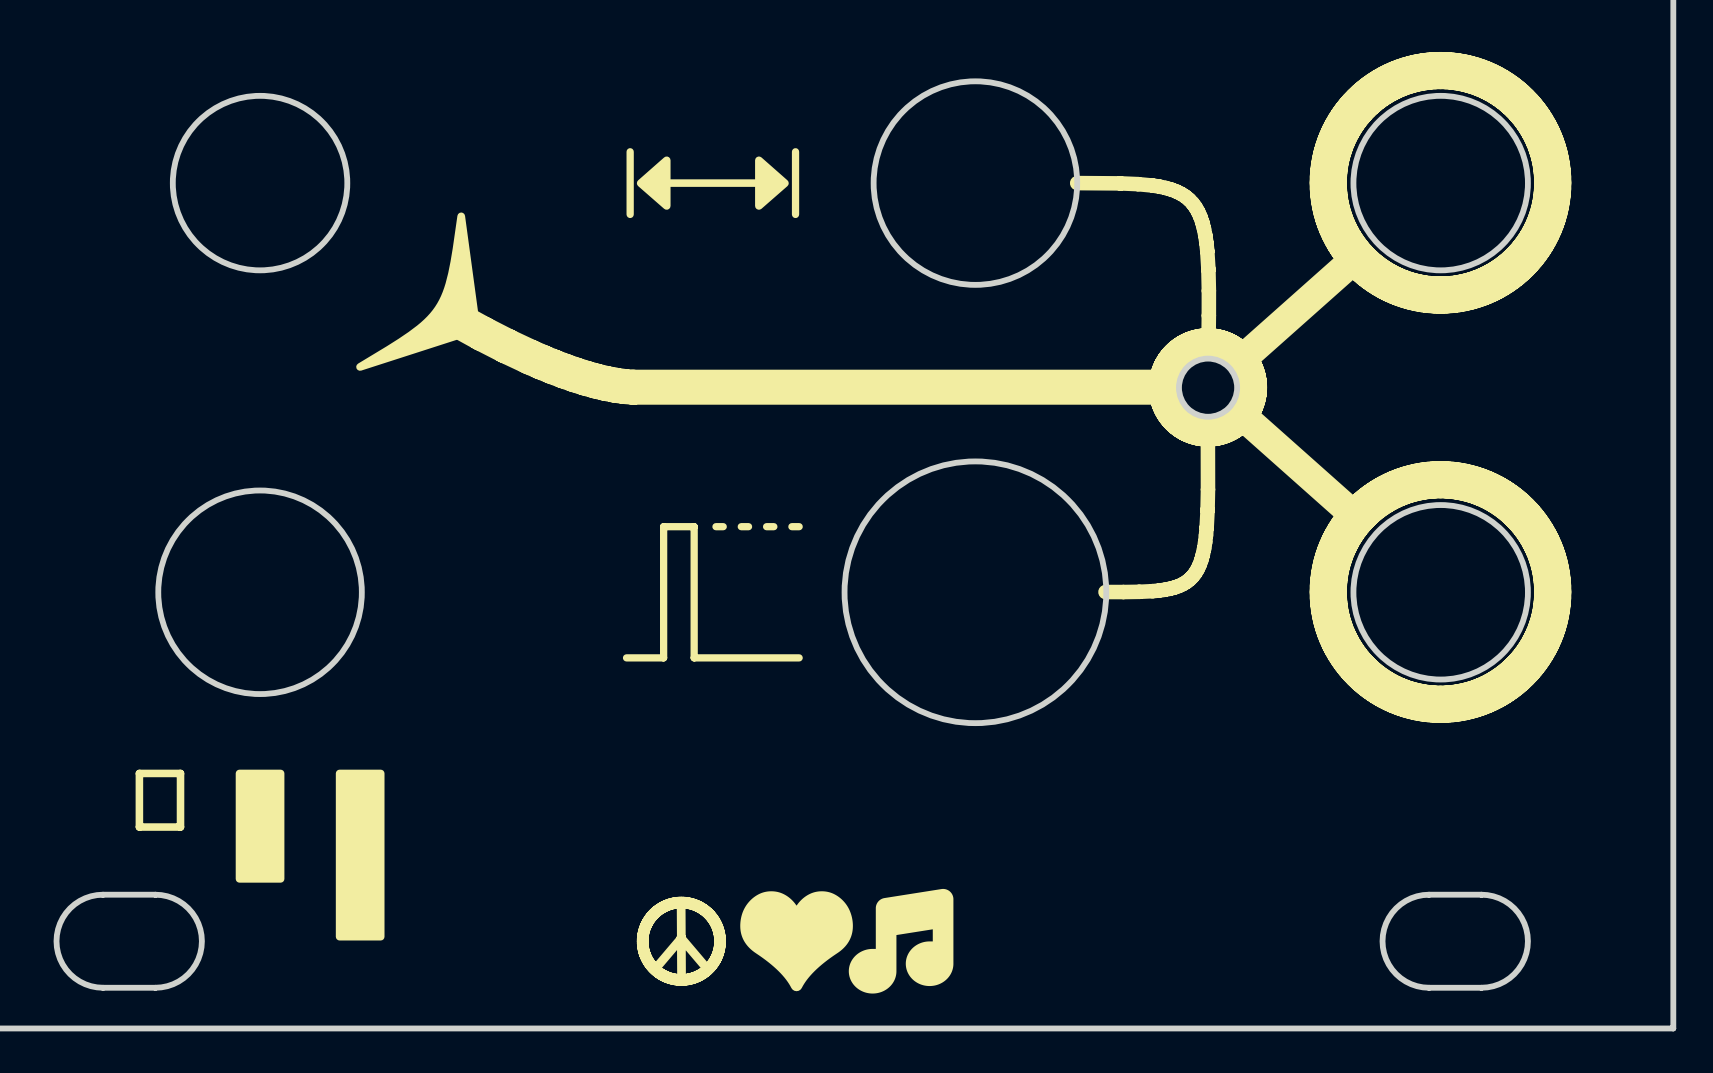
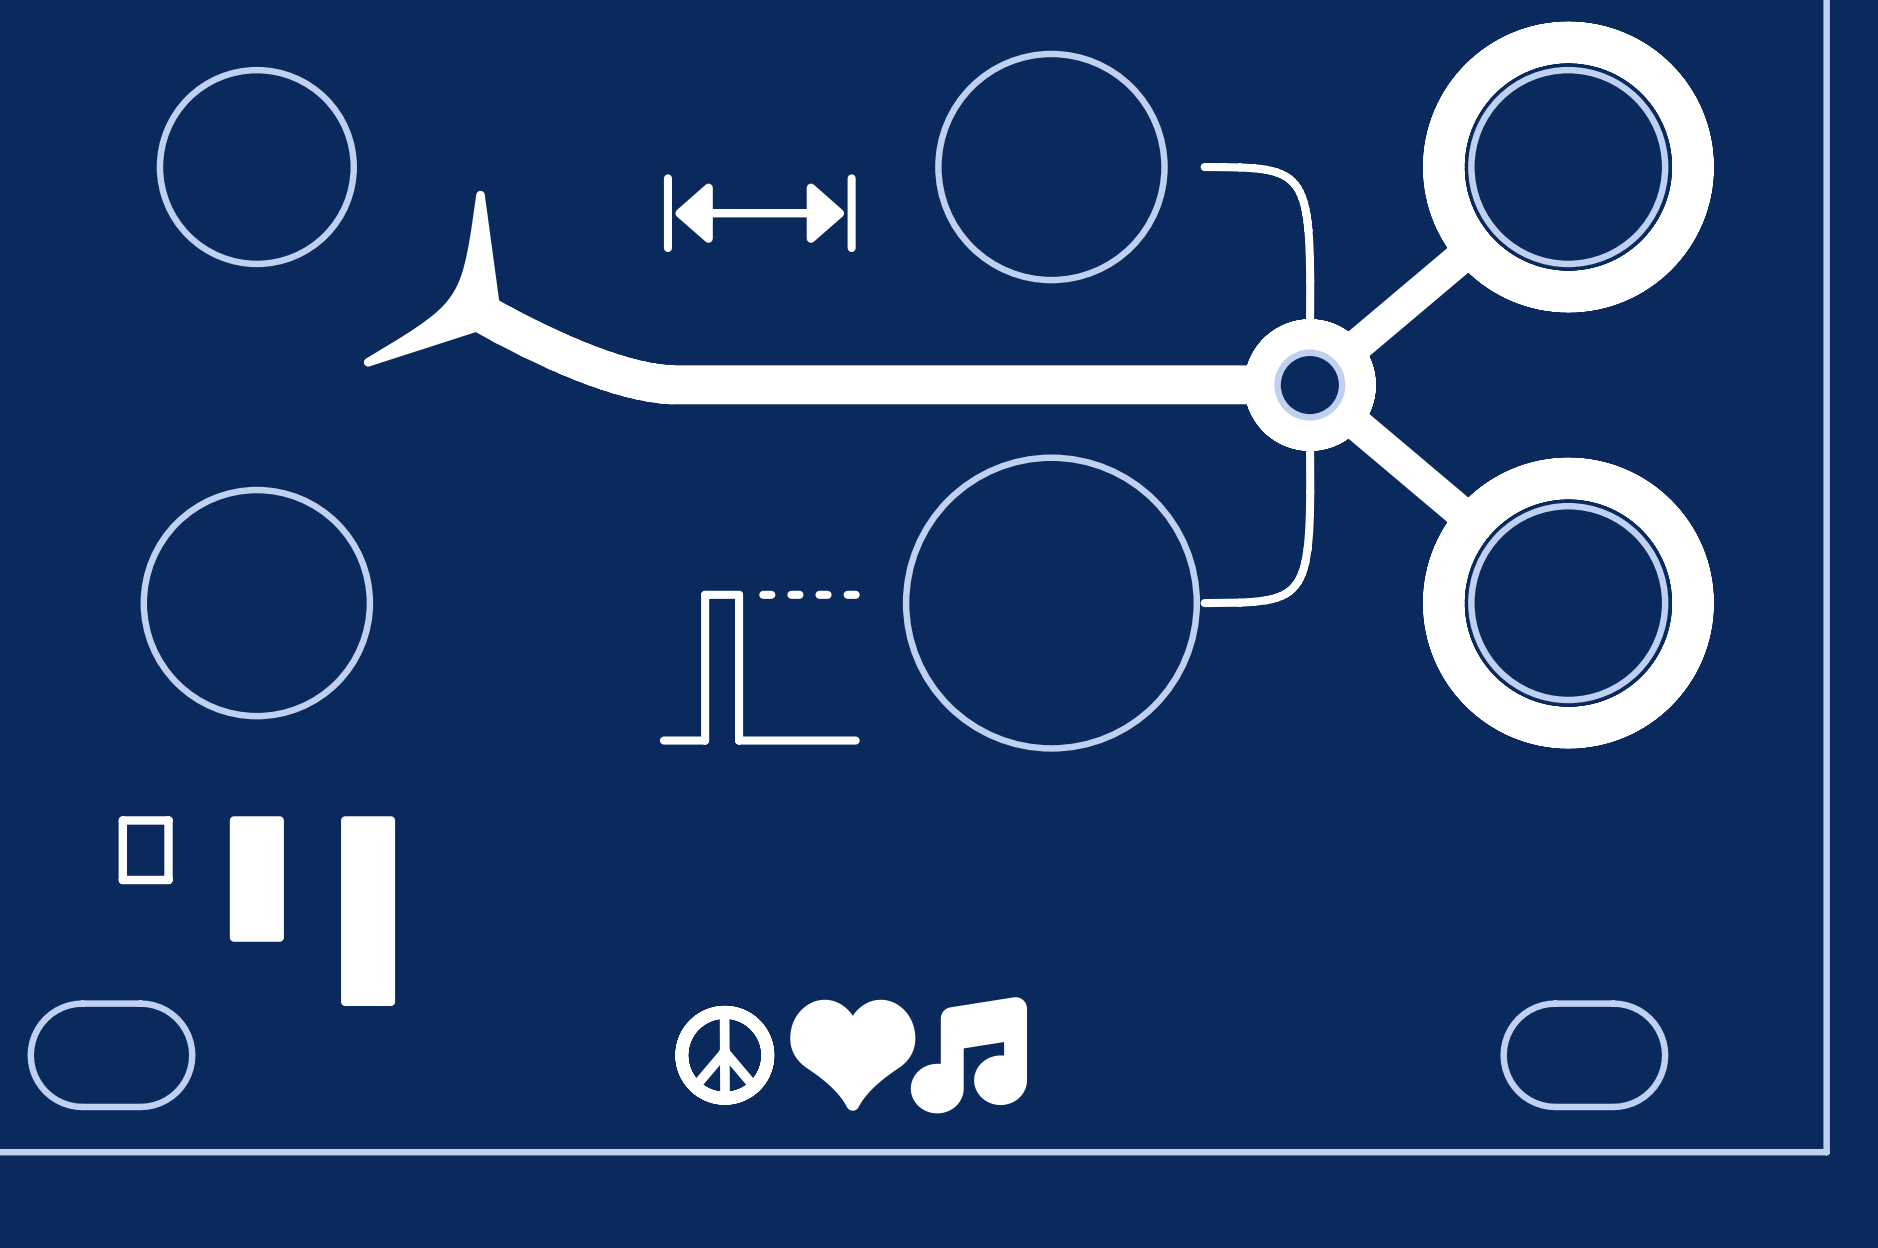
line: (1434, 70) (1412, 74) (1391, 81) (1373, 92) (1357, 107) (1344, 124) (1335, 144) (1329, 165) (1328, 188) (1331, 210) (1339, 231) (1350, 249) (1365, 265) (1382, 278) (1401, 288) (1423, 293) (1446, 294) (1468, 291) (1489, 283) (1507, 272) (1523, 258) (1536, 241) (1545, 221) (1551, 199) (1552, 177) (1549, 154) (1541, 134) (1530, 115) (1515, 99) (1498, 86) (1479, 77) (1457, 71) (1434, 70) -> (1562, 42) (1537, 46) (1514, 54) (1493, 67) (1476, 83) (1461, 102) (1451, 124) (1445, 148) (1443, 173) (1447, 198) (1456, 221) (1468, 241) (1484, 259) (1503, 273) (1525, 284) (1549, 290) (1574, 291) (1599, 287) (1622, 279) (1643, 266) (1660, 250) (1675, 231) (1685, 209) (1691, 186) (1692, 160) (1689, 135) (1680, 112) (1668, 92) (1652, 74) (1633, 60) (1611, 49) (1587, 43) (1562, 42)
line: none -> (1204, 167) (1254, 168) (1271, 170) (1288, 178) (1297, 188) (1303, 202) (1308, 230) (1310, 336)
round board edge position: (260, 183) -> (256, 167)
round board edge position: (975, 183) -> (1051, 167)
line: (1077, 183) (1137, 184) (1159, 186) (1181, 193) (1192, 203) (1200, 216) (1206, 242) (1208, 343) -> none
round board edge position: (1440, 183) -> (1568, 167)
line: none -> (1473, 247) (1349, 351)
line: (1351, 261) (1248, 353) -> none
drawing position: (418, 291) -> (432, 278)
line: (458, 320) (506, 346) (552, 366) (595, 381) (624, 386) (1162, 387) -> (477, 310) (530, 339) (582, 362) (630, 377) (661, 384) (1259, 384)
line: (1205, 342) (1223, 345) (1237, 354) (1248, 368) (1252, 385) (1249, 402) (1240, 417) (1227, 427) (1210, 432) (1192, 429) (1177, 420) (1167, 406) (1163, 389) (1165, 372) (1174, 357) (1188, 347) (1205, 342) -> (1310, 335) (1329, 339) (1345, 349) (1355, 365) (1359, 385) (1355, 404) (1345, 420) (1329, 430) (1310, 434) (1290, 430) (1274, 420) (1264, 404) (1260, 385) (1264, 365) (1274, 349) (1290, 339) (1310, 335)
line: none -> (1349, 418) (1472, 522)
line: none -> (1310, 436) (1309, 532) (1305, 562) (1297, 581) (1288, 591) (1271, 599) (1254, 601) (1204, 603)
round board edge position: (1208, 387) -> (1309, 385)
line: (1248, 421) (1348, 510) -> none
line: (1207, 438) (1205, 535) (1201, 560) (1195, 573) (1186, 581) (1169, 588) (1152, 591) (1105, 592) -> none
line: (1434, 479) (1457, 481) (1479, 486) (1498, 495) (1515, 508) (1530, 524) (1541, 543) (1549, 563) (1552, 586) (1551, 609) (1545, 630) (1536, 650) (1523, 667) (1507, 681) (1489, 693) (1468, 700) (1446, 704) (1423, 702) (1401, 697) (1382, 688) (1365, 675) (1350, 659) (1339, 640) (1331, 620) (1328, 597) (1329, 574) (1335, 553) (1344, 533) (1357, 516) (1373, 502) (1391, 490) (1412, 483) (1434, 479) -> (1562, 478) (1587, 479) (1611, 485) (1633, 496) (1652, 510) (1668, 528) (1680, 549) (1689, 571) (1692, 596) (1691, 622) (1685, 645) (1675, 667) (1660, 686) (1643, 703) (1622, 715) (1599, 723) (1574, 727) (1549, 726) (1525, 720) (1503, 709) (1484, 695) (1468, 677) (1456, 657) (1447, 634) (1443, 609) (1445, 584) (1451, 560) (1461, 538) (1476, 519) (1493, 503) (1514, 490) (1537, 482) (1562, 478)
round board edge position: (260, 592) -> (256, 603)
round board edge position: (975, 592) -> (1051, 603)
round board edge position: (1440, 592) -> (1568, 603)
line: (139, 773) (180, 773) -> (122, 868) (122, 820) (168, 820) (168, 868)
line: (139, 783) (139, 827) (180, 827) (180, 783) -> (122, 879) (168, 879)
drawing position: (260, 826) -> (256, 879)
drawing position: (360, 855) -> (368, 911)

